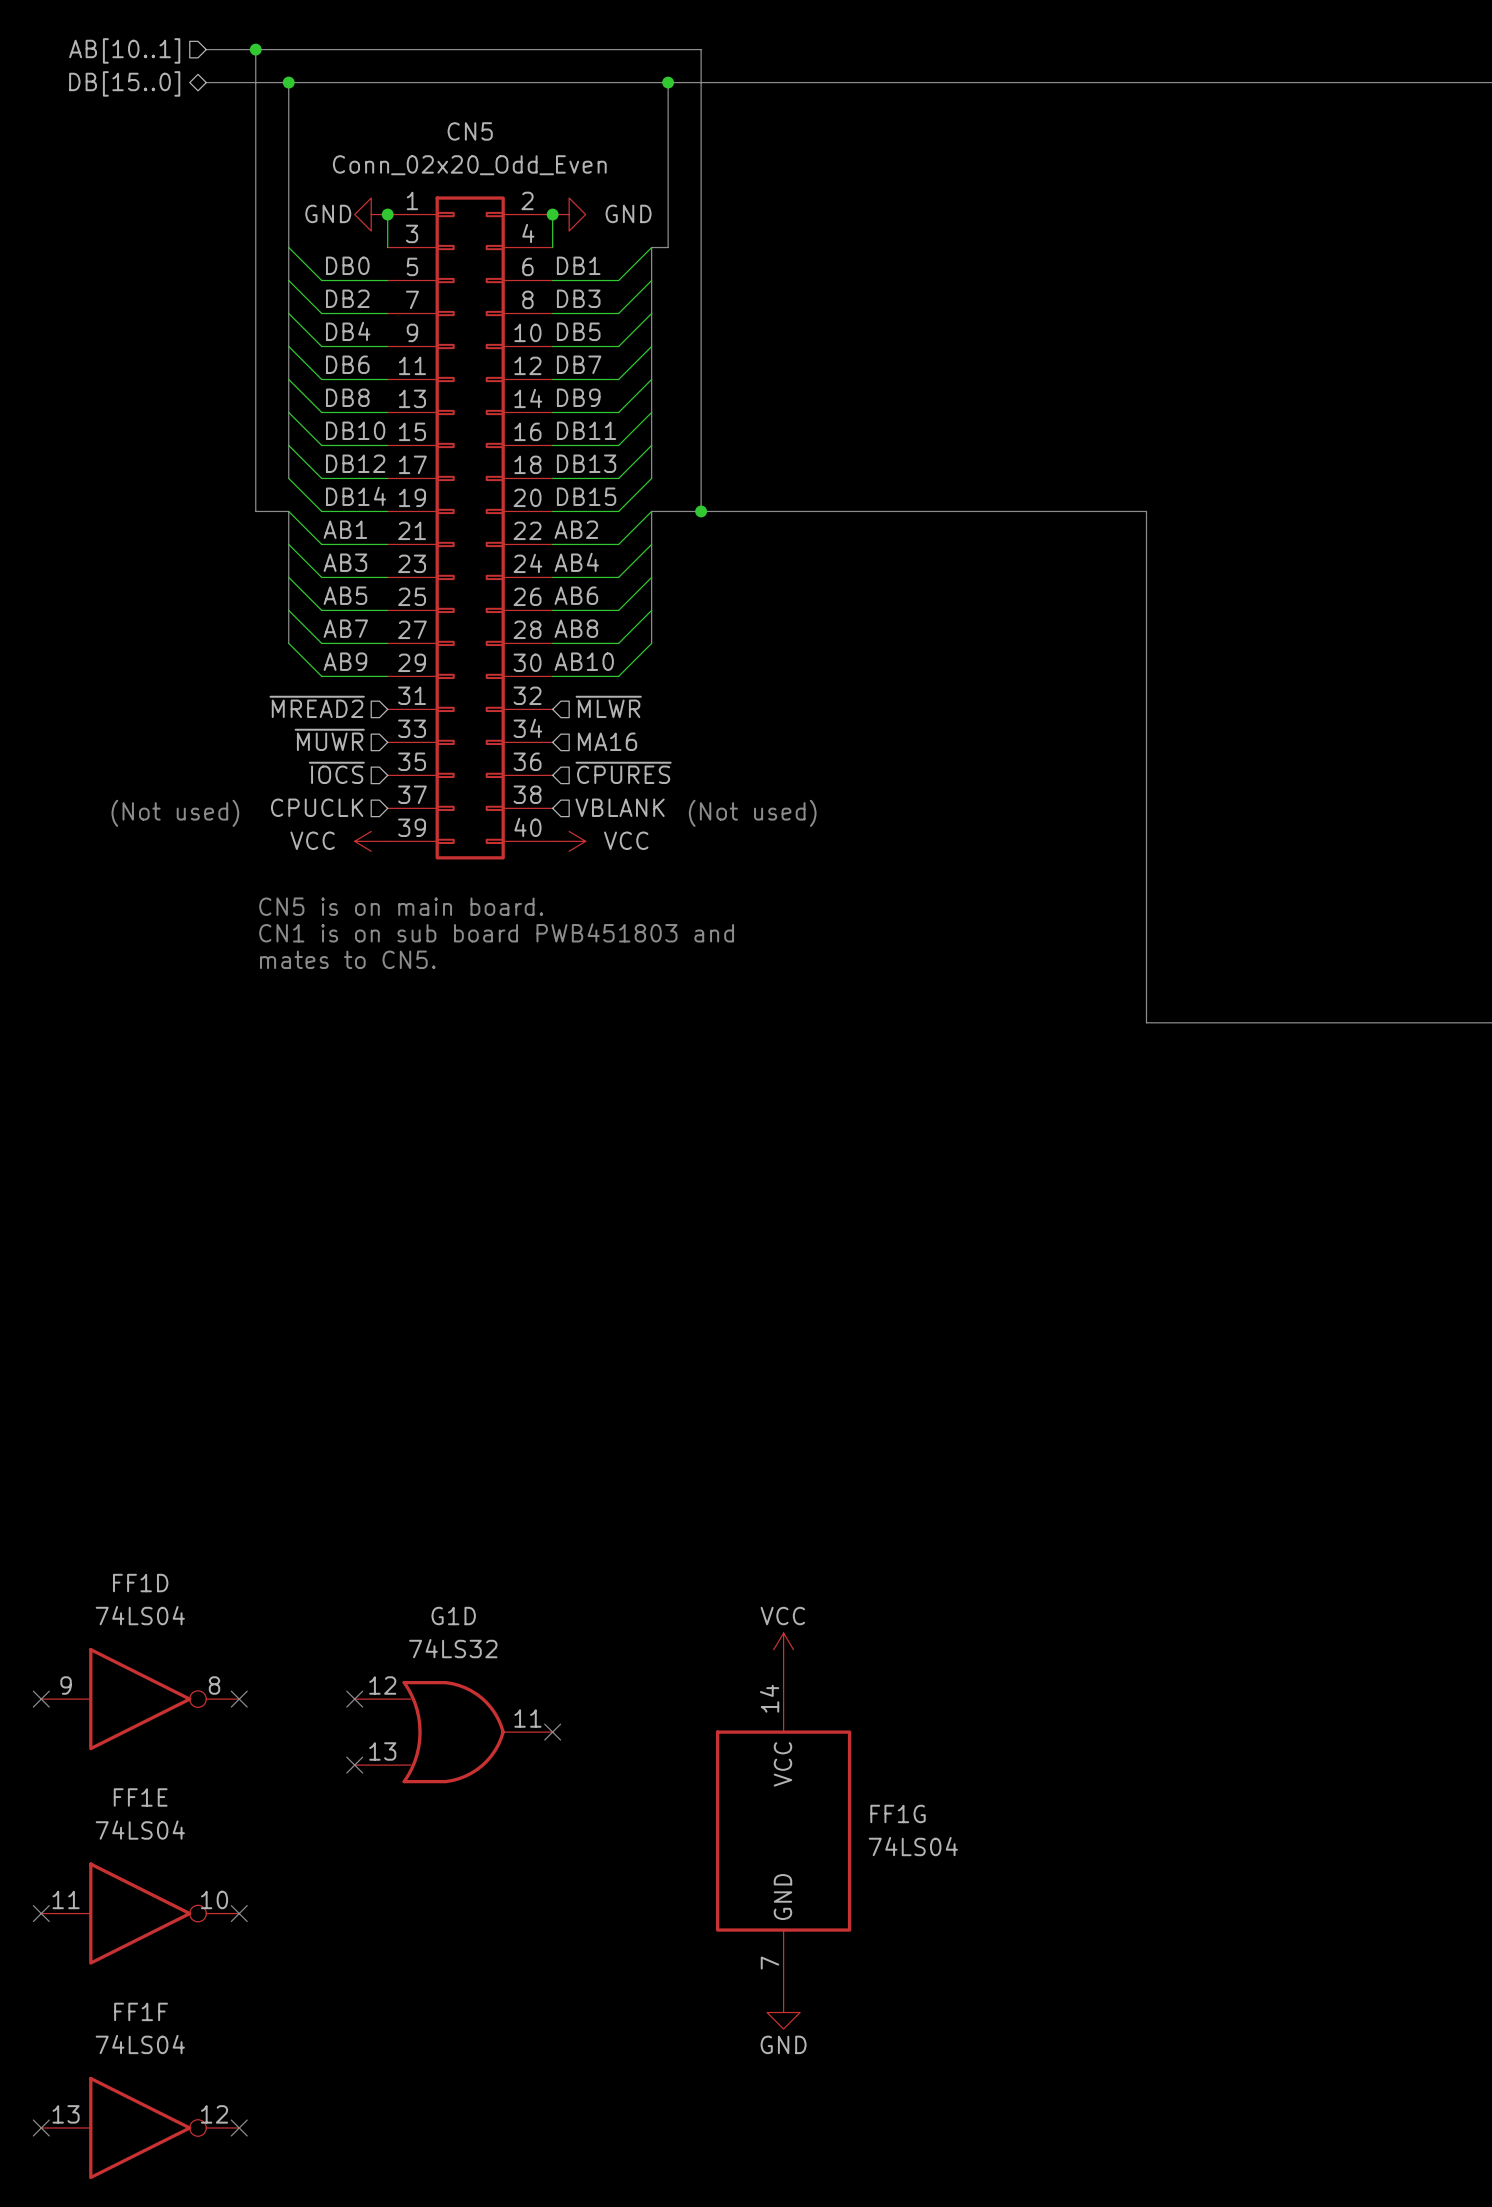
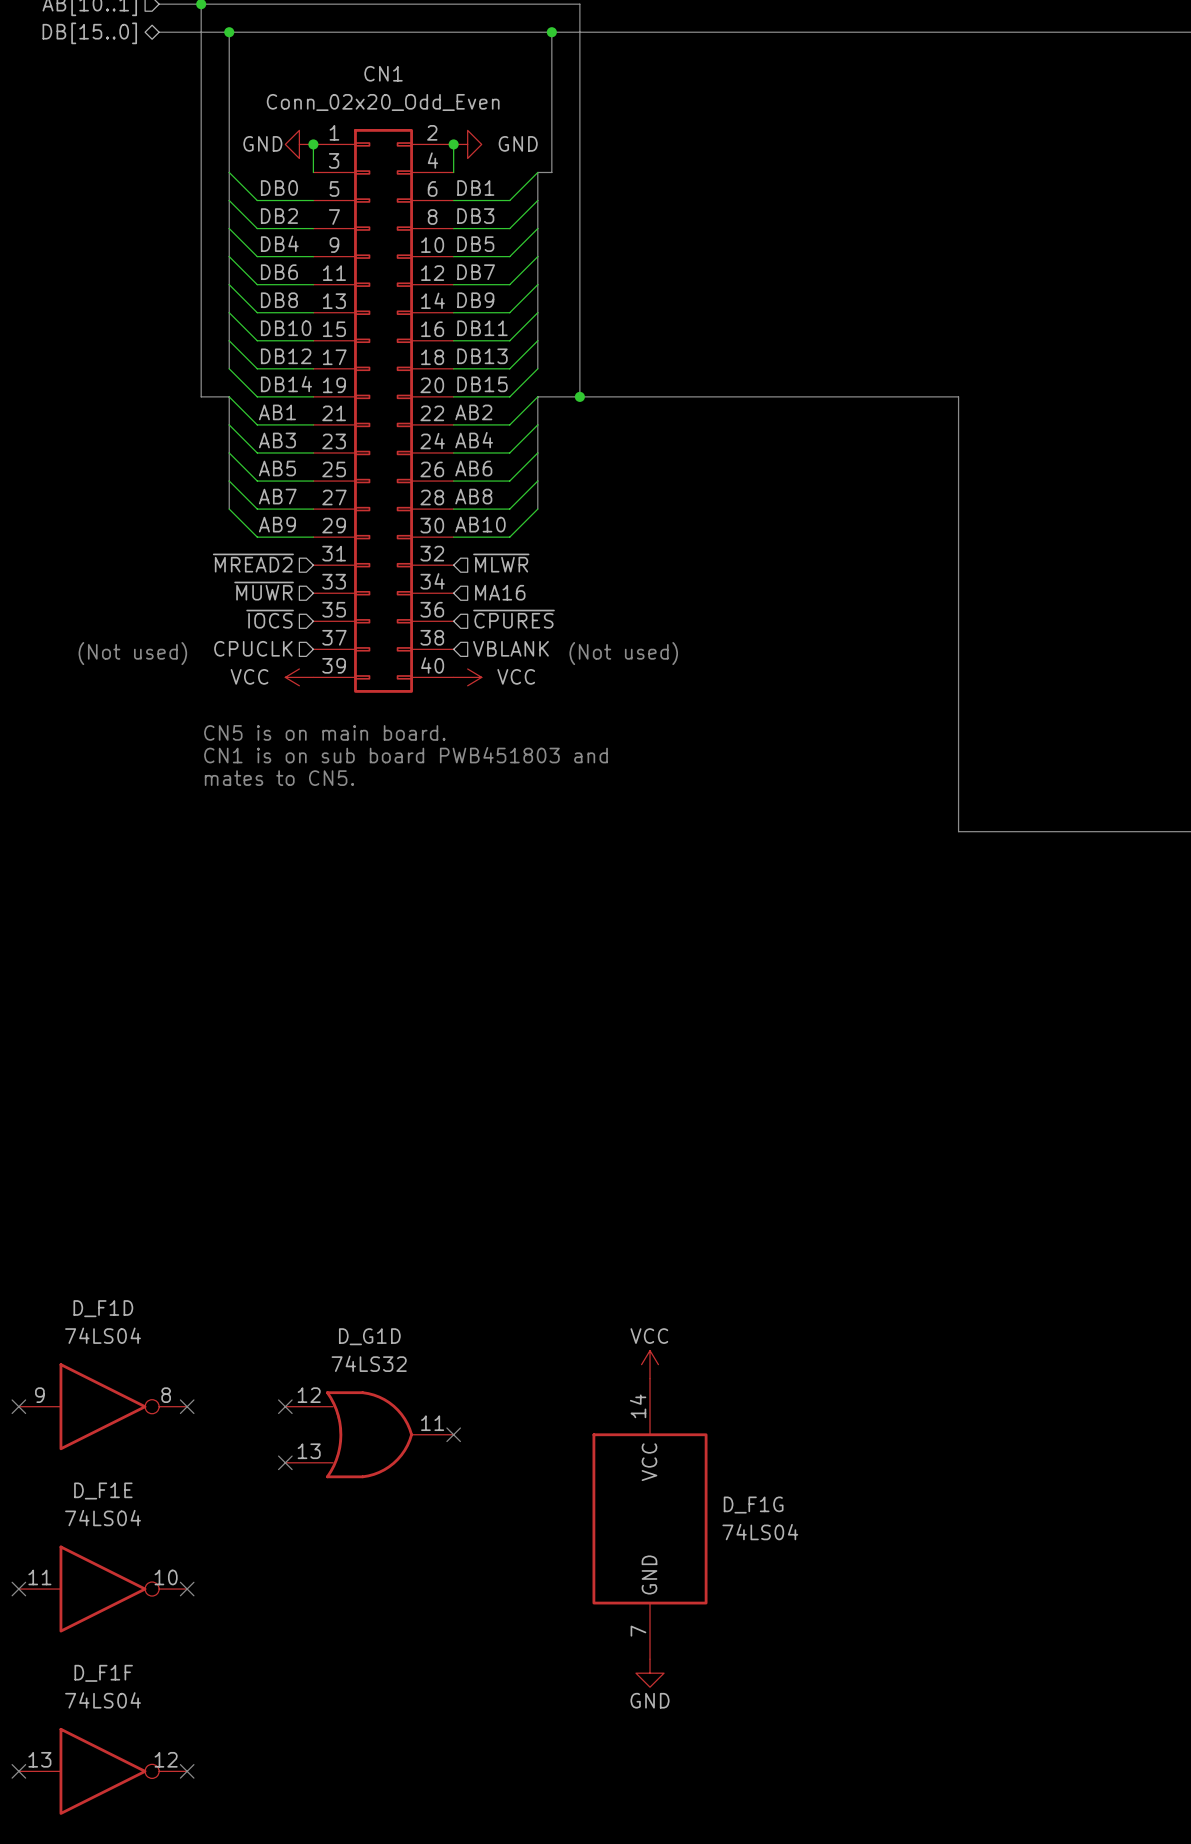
CN5 name: CN5 (470, 131) -> CN1 (383, 73)
FF1D name: FF1D (140, 1583) -> D_F1D (103, 1308)
G1D name: G1D (453, 1616) -> D_G1D (369, 1336)
FF1E name: FF1E (140, 1797) -> D_F1E (103, 1491)
FF1G name: FF1G (898, 1813) -> D_F1G (753, 1505)
FF1F name: FF1F (141, 2011) -> D_F1F (103, 1673)

